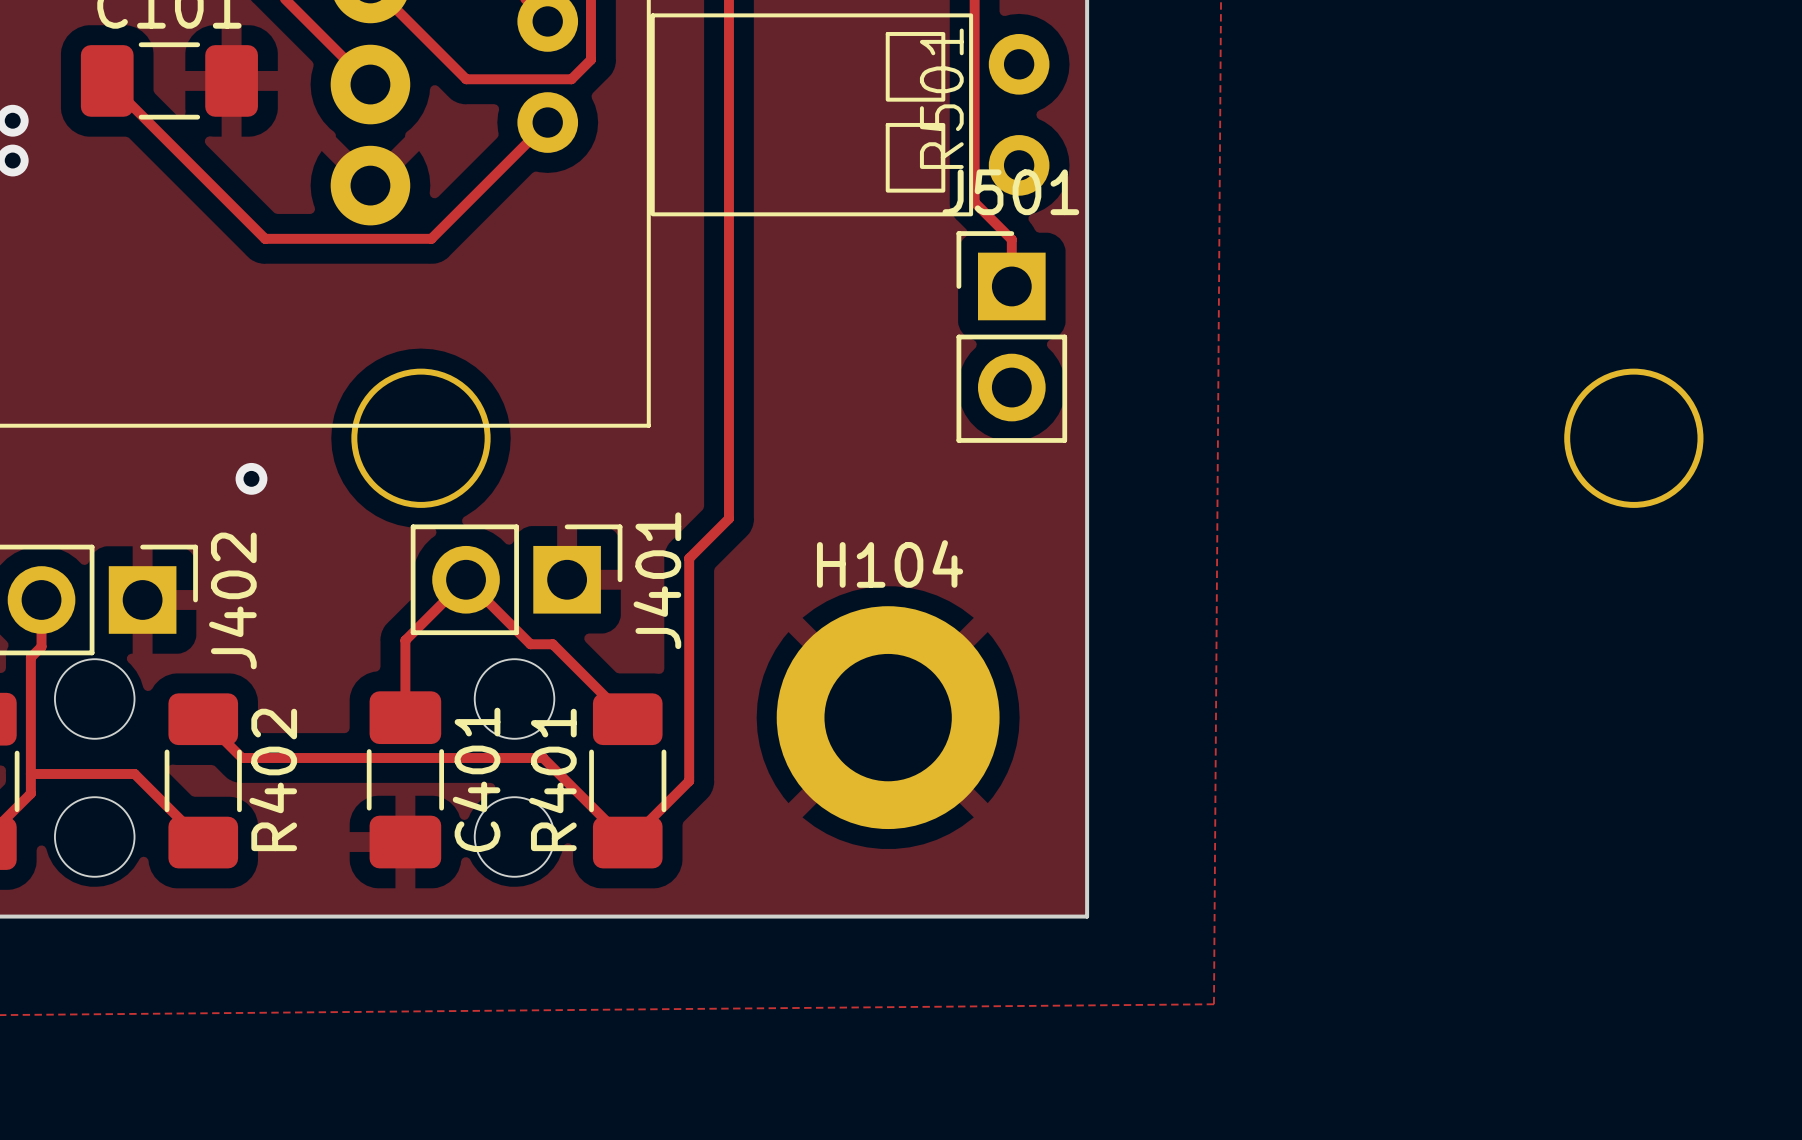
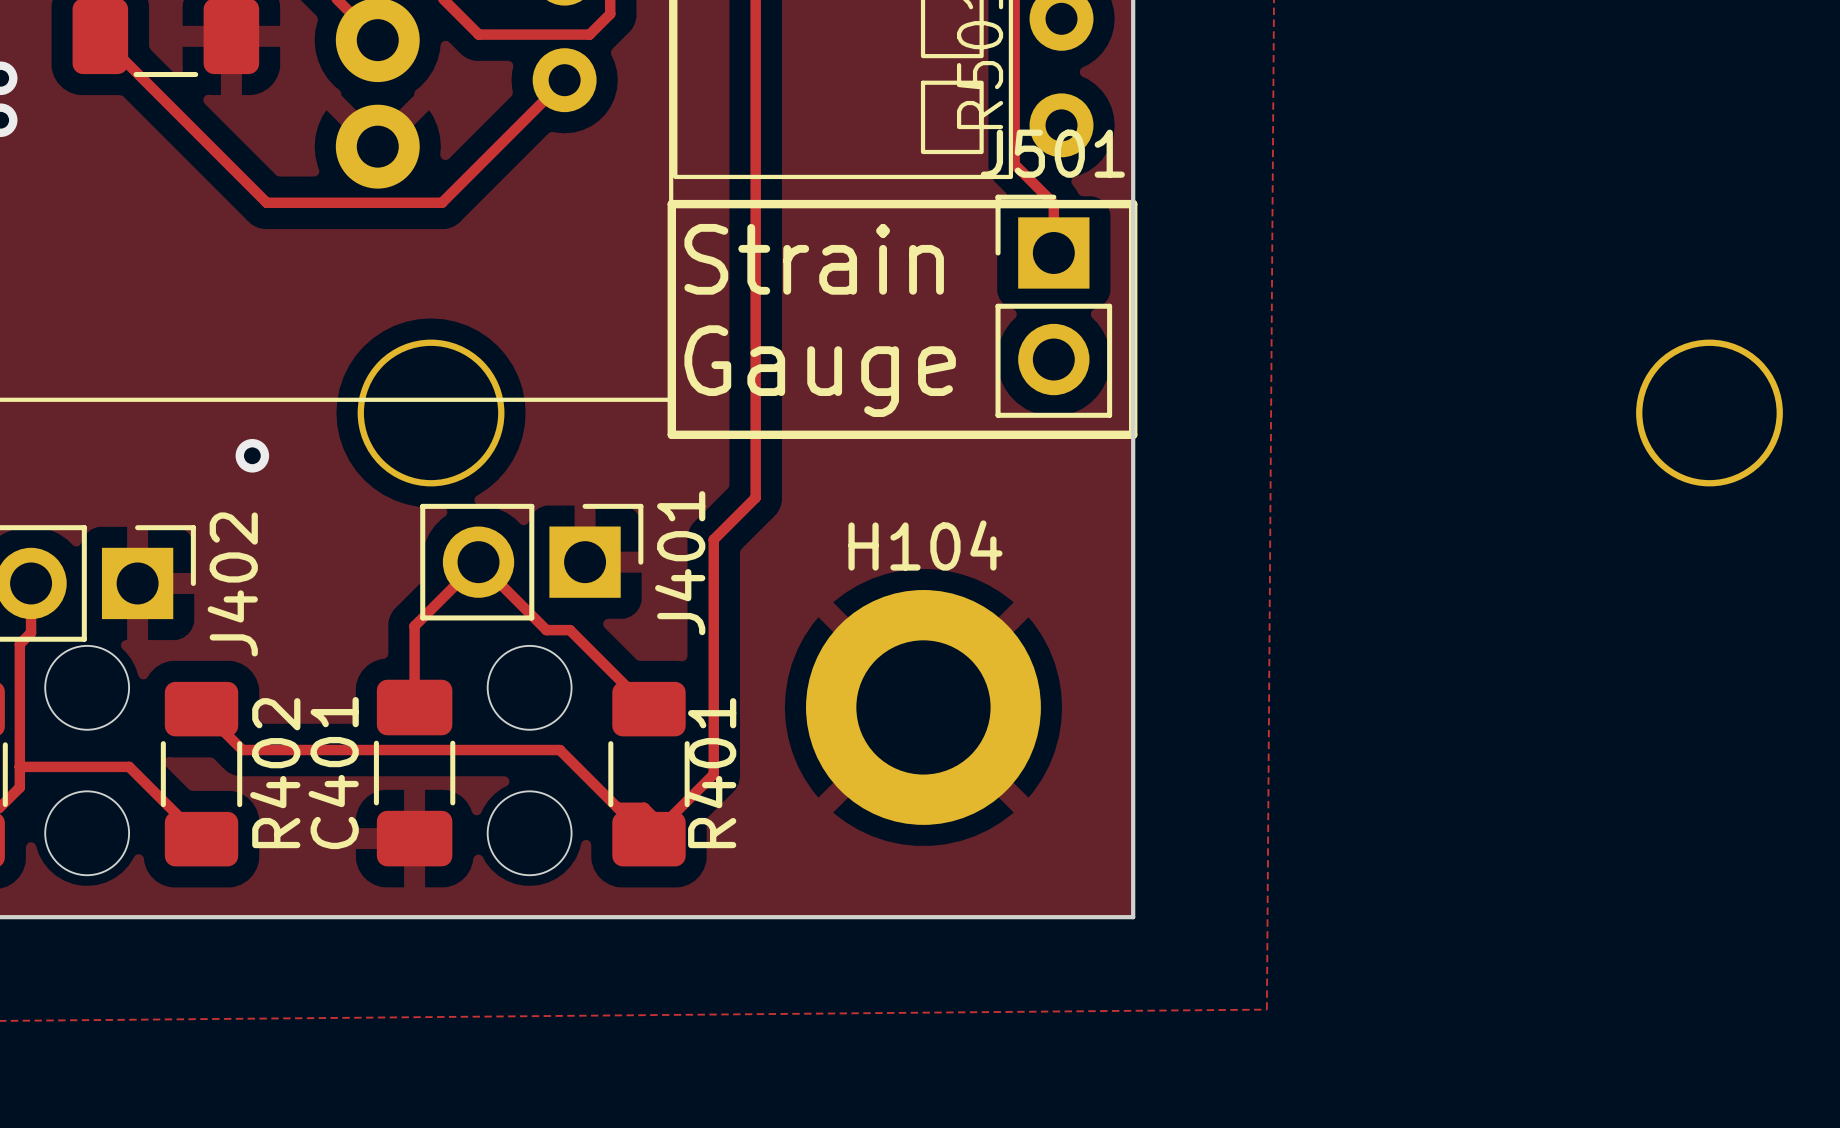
line: none -> (671, 204) (1133, 204) (1133, 434) (671, 434) (671, 204)
text: none -> Strain (814, 259)
text: none -> Gauge (820, 371)
C401 name position: C401 (476, 779) -> C401 (333, 773)
R401 name position: R401 (552, 779) -> R401 (711, 773)
track: none -> (617, 807) (644, 807) (662, 825)

